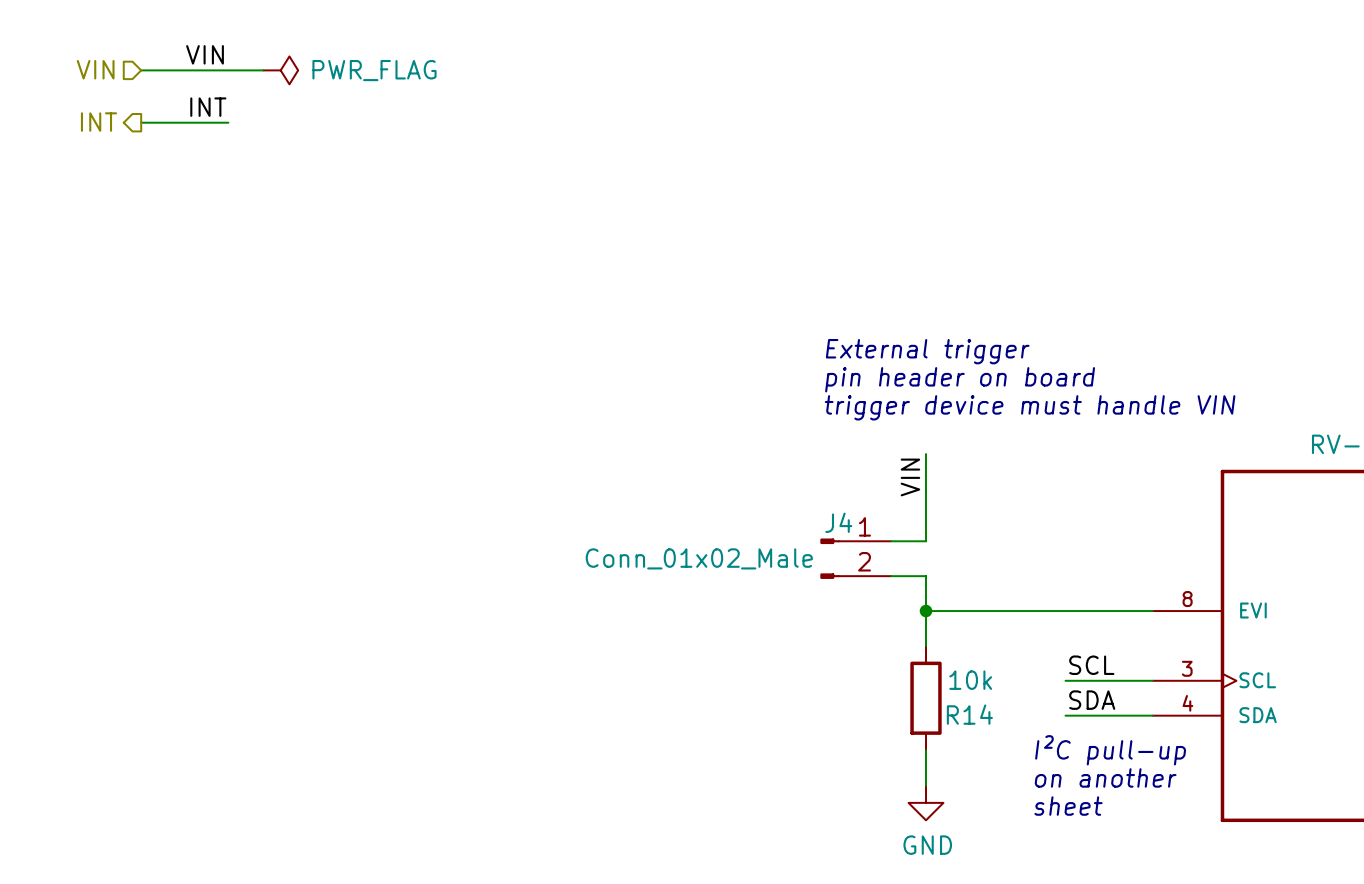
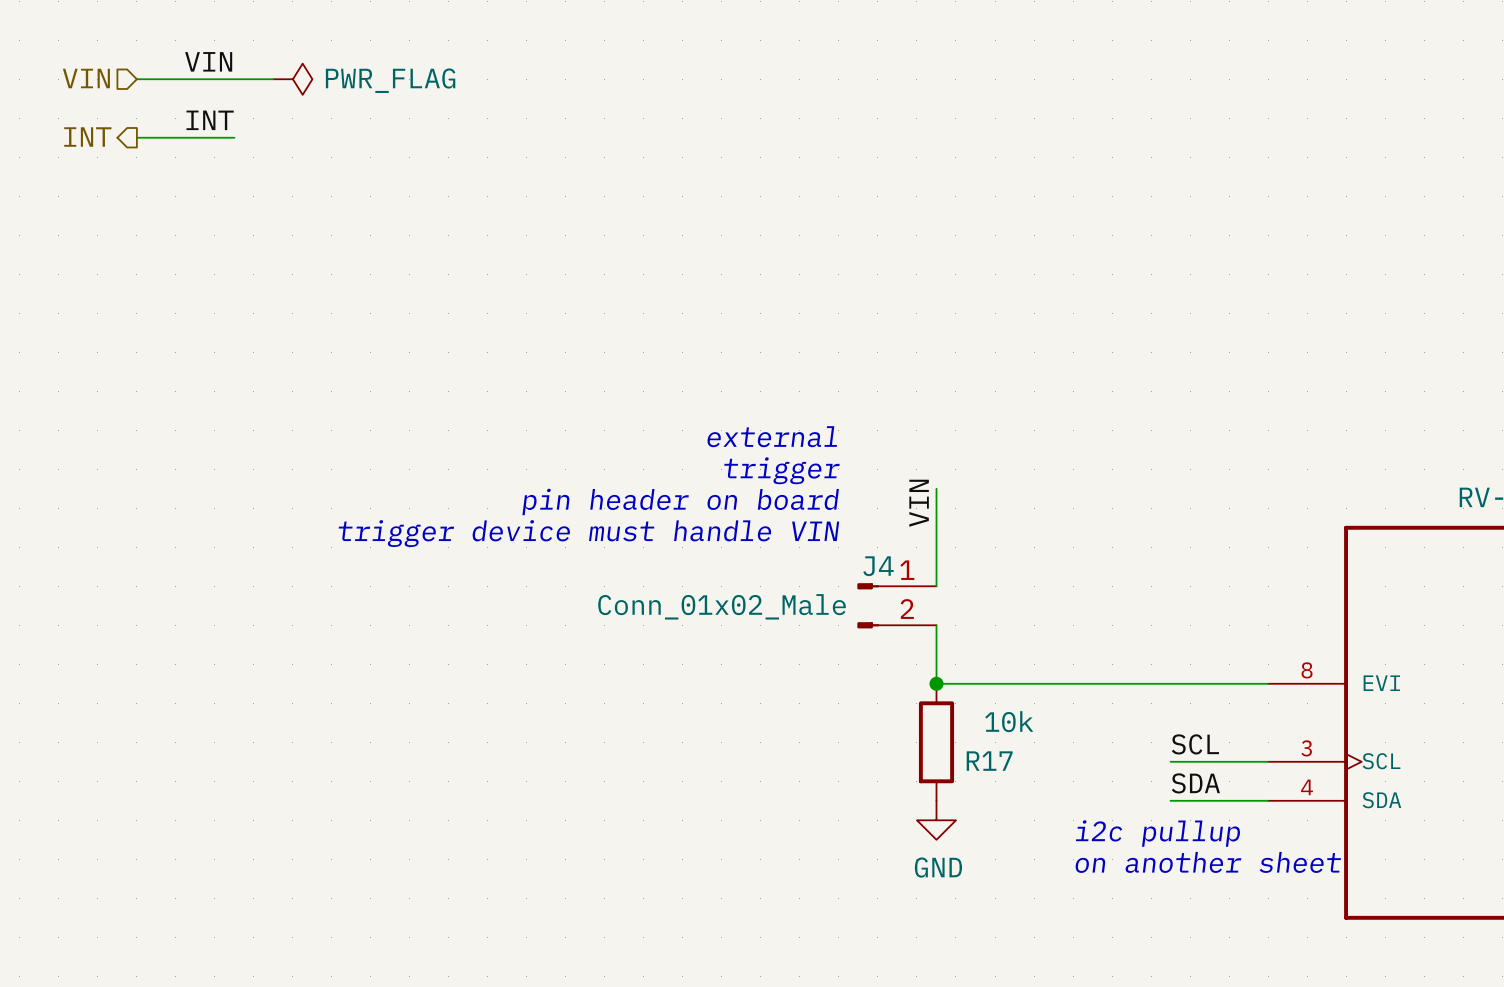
text: External trigger (927, 351) -> none
text position: pin header on board (960, 379) -> pin header on board (680, 502)
text: none -> external (772, 436)
text position: trigger device must handle VIN (1030, 407) -> trigger device must handle VIN (588, 533)
text: none -> trigger (781, 470)
wire: none -> (936, 488) (936, 586)
wire: (926, 454) (926, 541) (891, 541) -> none
label position: VIN (910, 477) -> VIN (919, 503)
J4 position: (855, 558) -> (896, 605)
wire: none -> (936, 625) (936, 683) (1014, 683)
wire: (891, 576) (926, 576) (926, 645) -> none
junction position: (926, 611) -> (936, 683)
R17: none -> 10k (936, 742)
R14: 10k (926, 698) -> none
wire: (926, 750) (926, 785) -> none
text: I²C pull-up (1110, 750) -> i2c pullup (1158, 833)
text: on another (1105, 777) -> on another sheet (1208, 862)
power symbol position: GND (926, 802) -> GND (936, 820)
text: sheet (1068, 806) -> none

